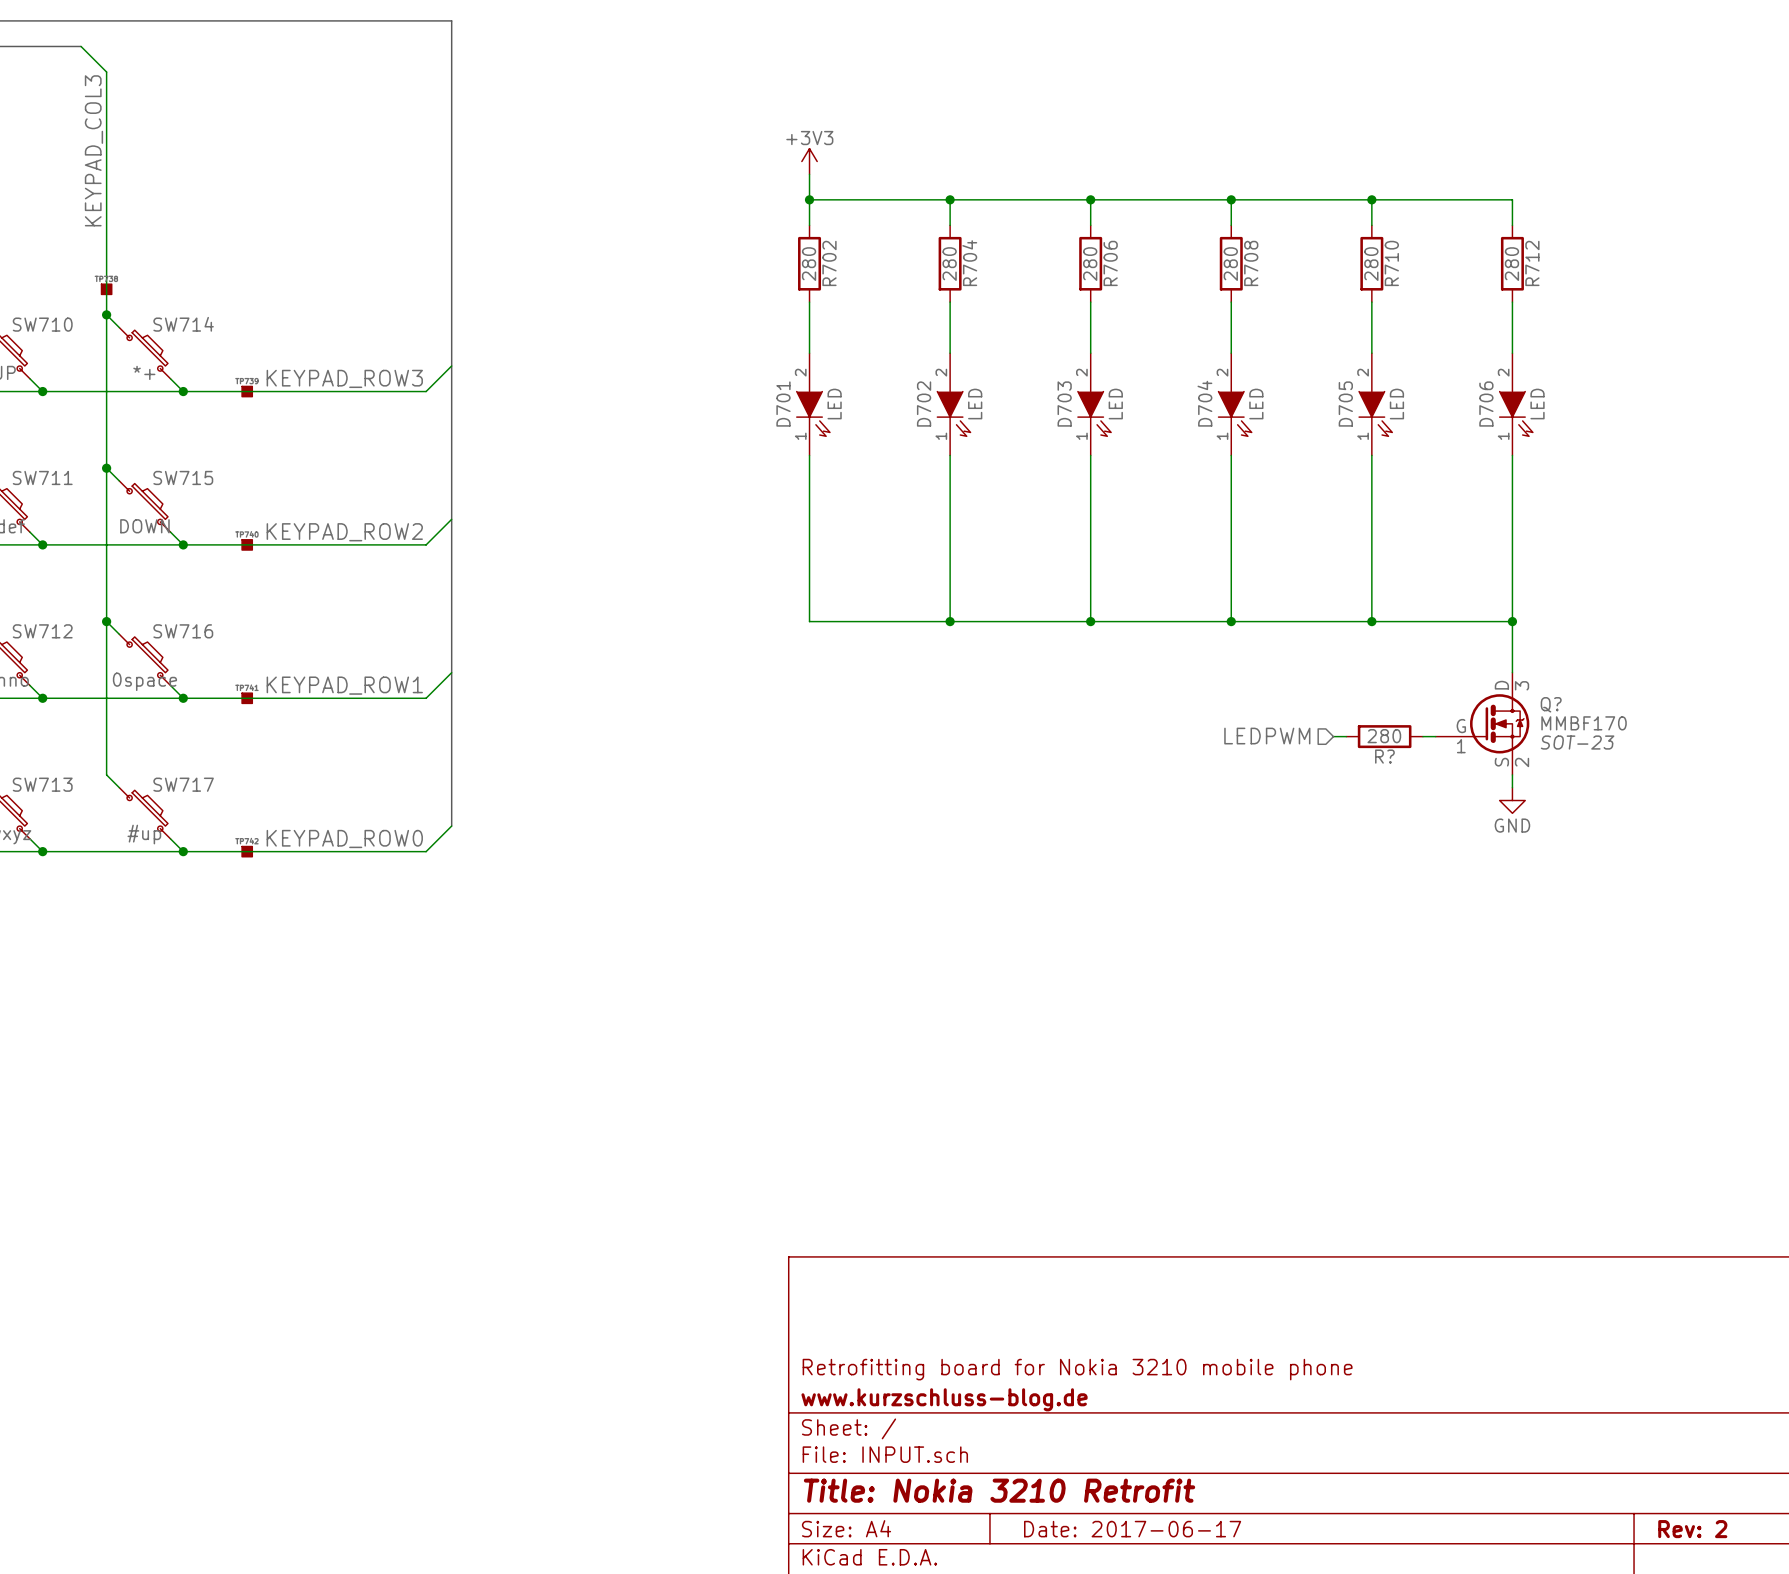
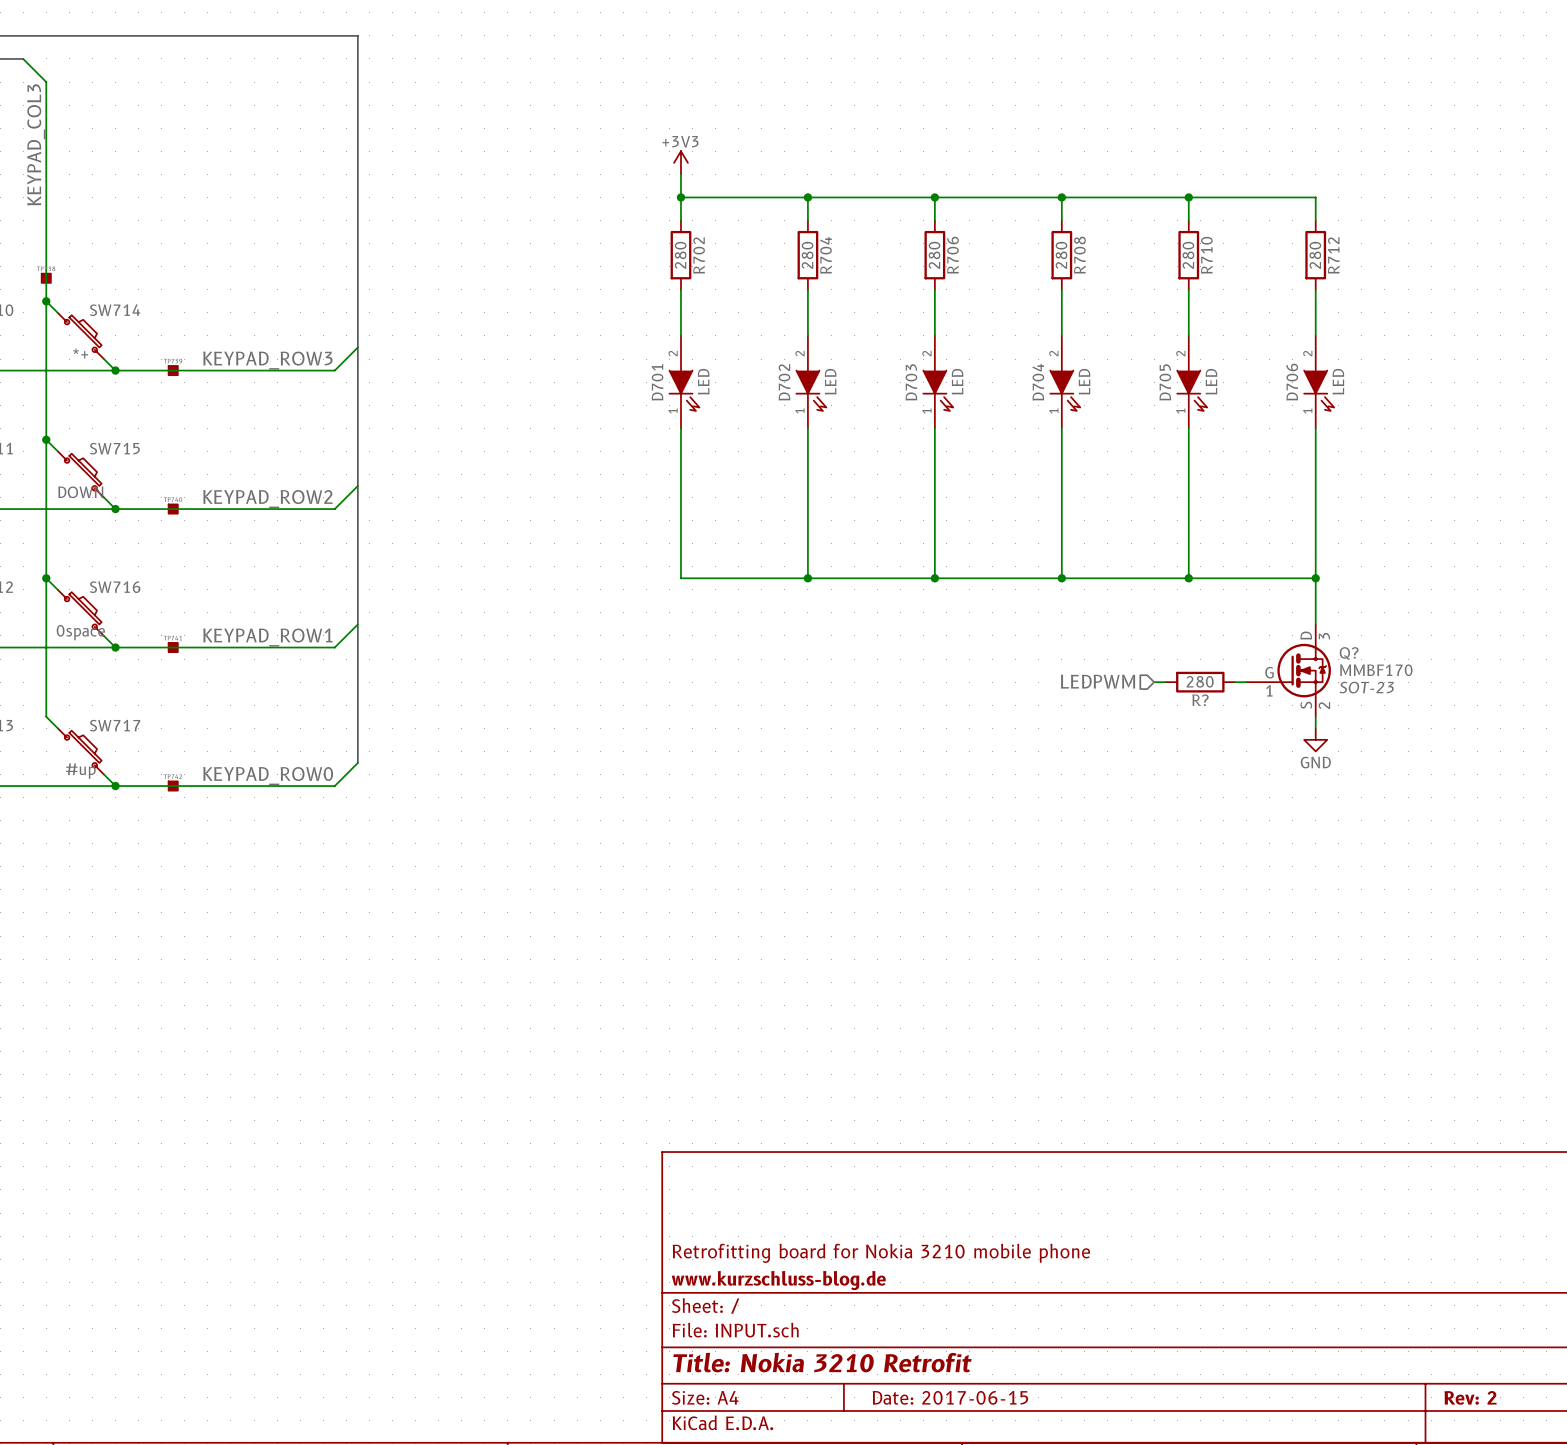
title block: Date: 2017-06-17 (1132, 1529) -> Date: 2017-06-15 (950, 1397)

